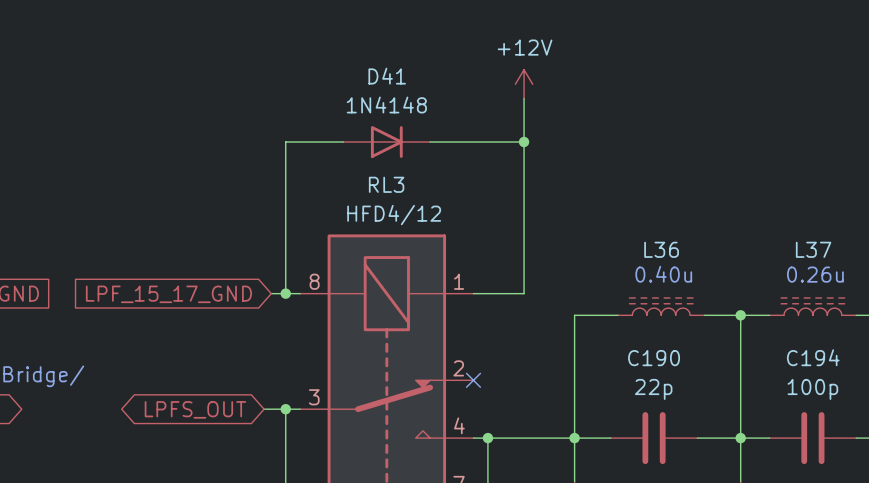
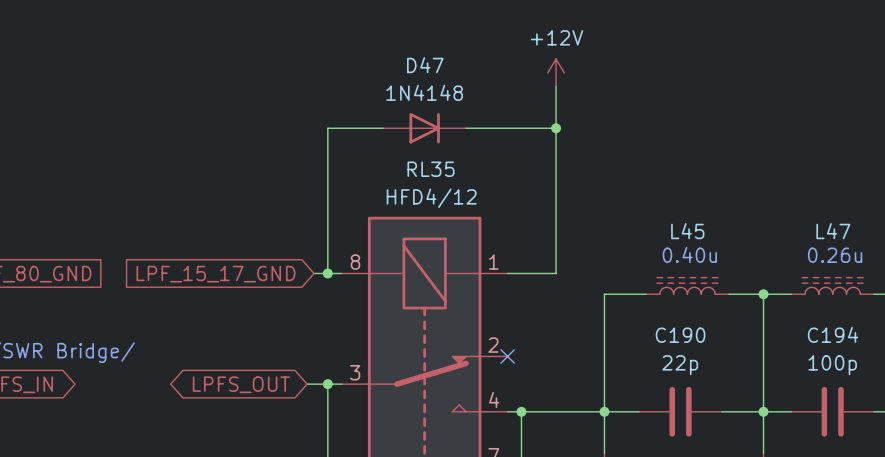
D41 name: D41 (387, 76) -> D47 (425, 65)
RL3 name: RL3 (386, 184) -> RL35 (431, 169)
L36 name: L36 (661, 249) -> L45 (687, 231)
L37 name: L37 (813, 249) -> L47 (833, 231)

